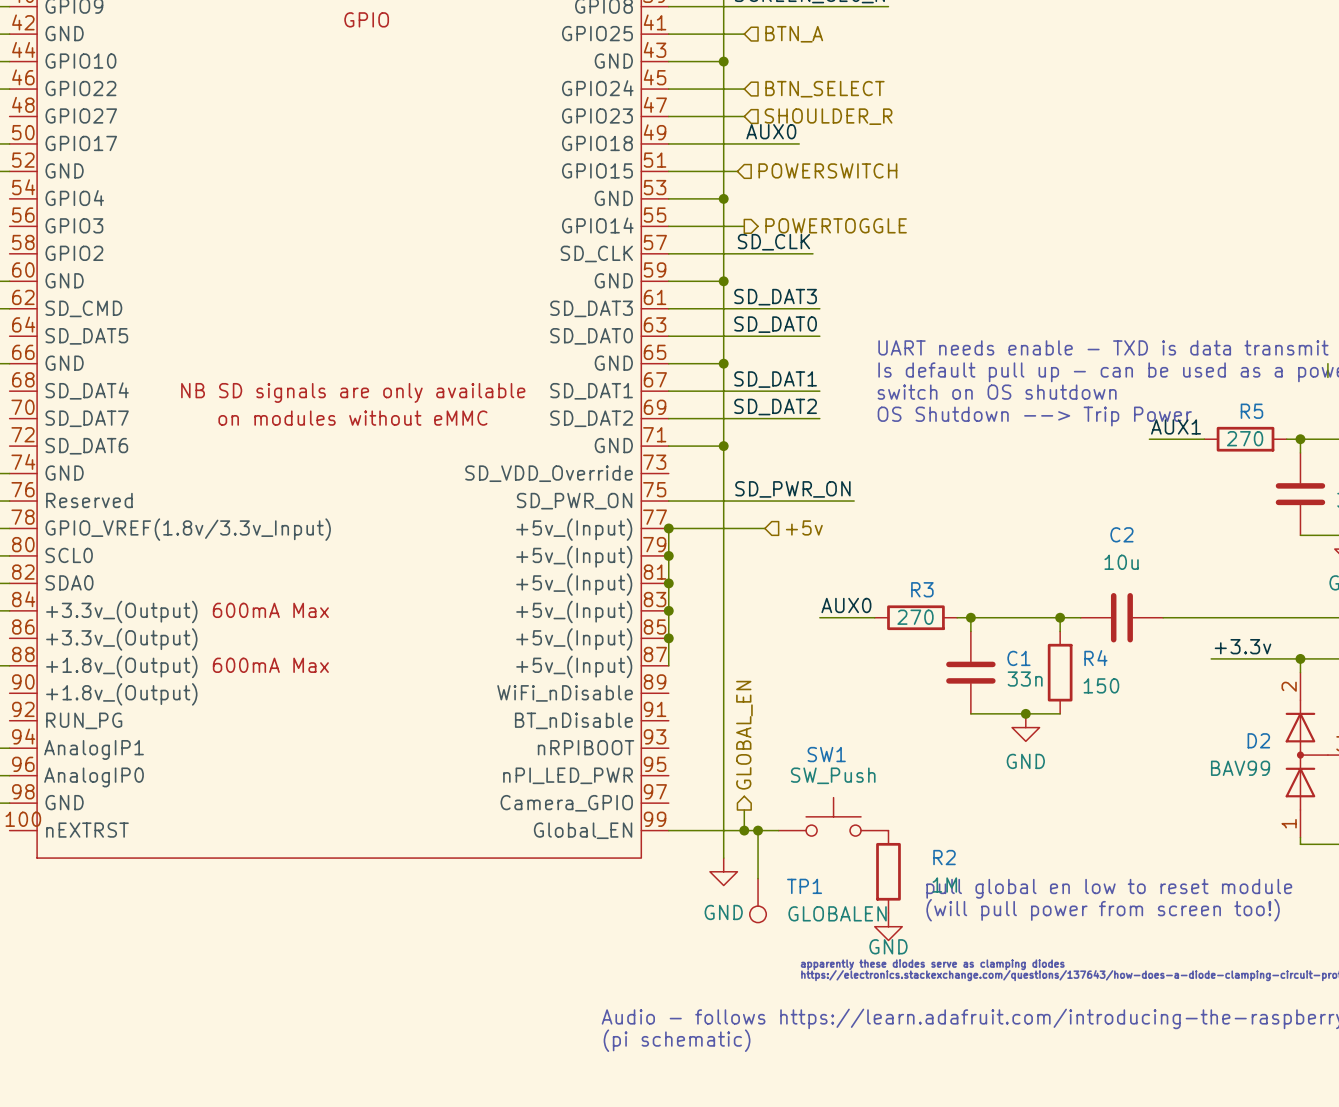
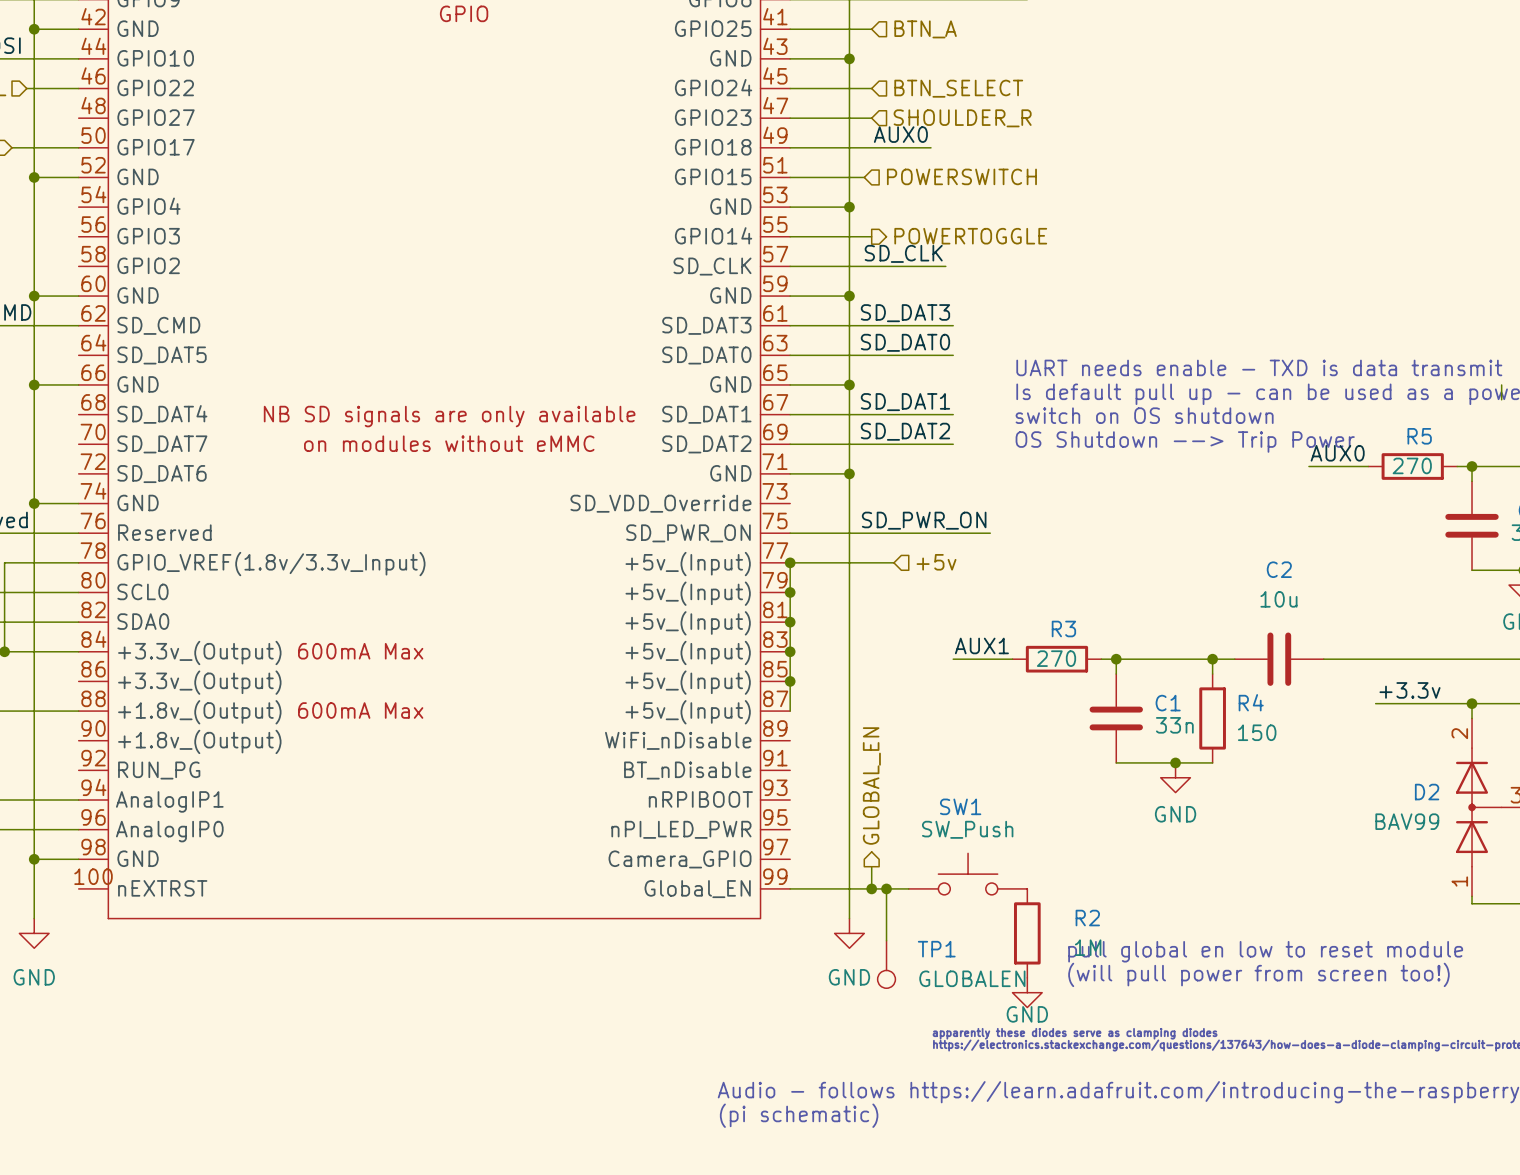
label: AUX1 (1175, 426) -> AUX0 (1337, 453)
label: AUX0 (846, 605) -> AUX1 (981, 645)

